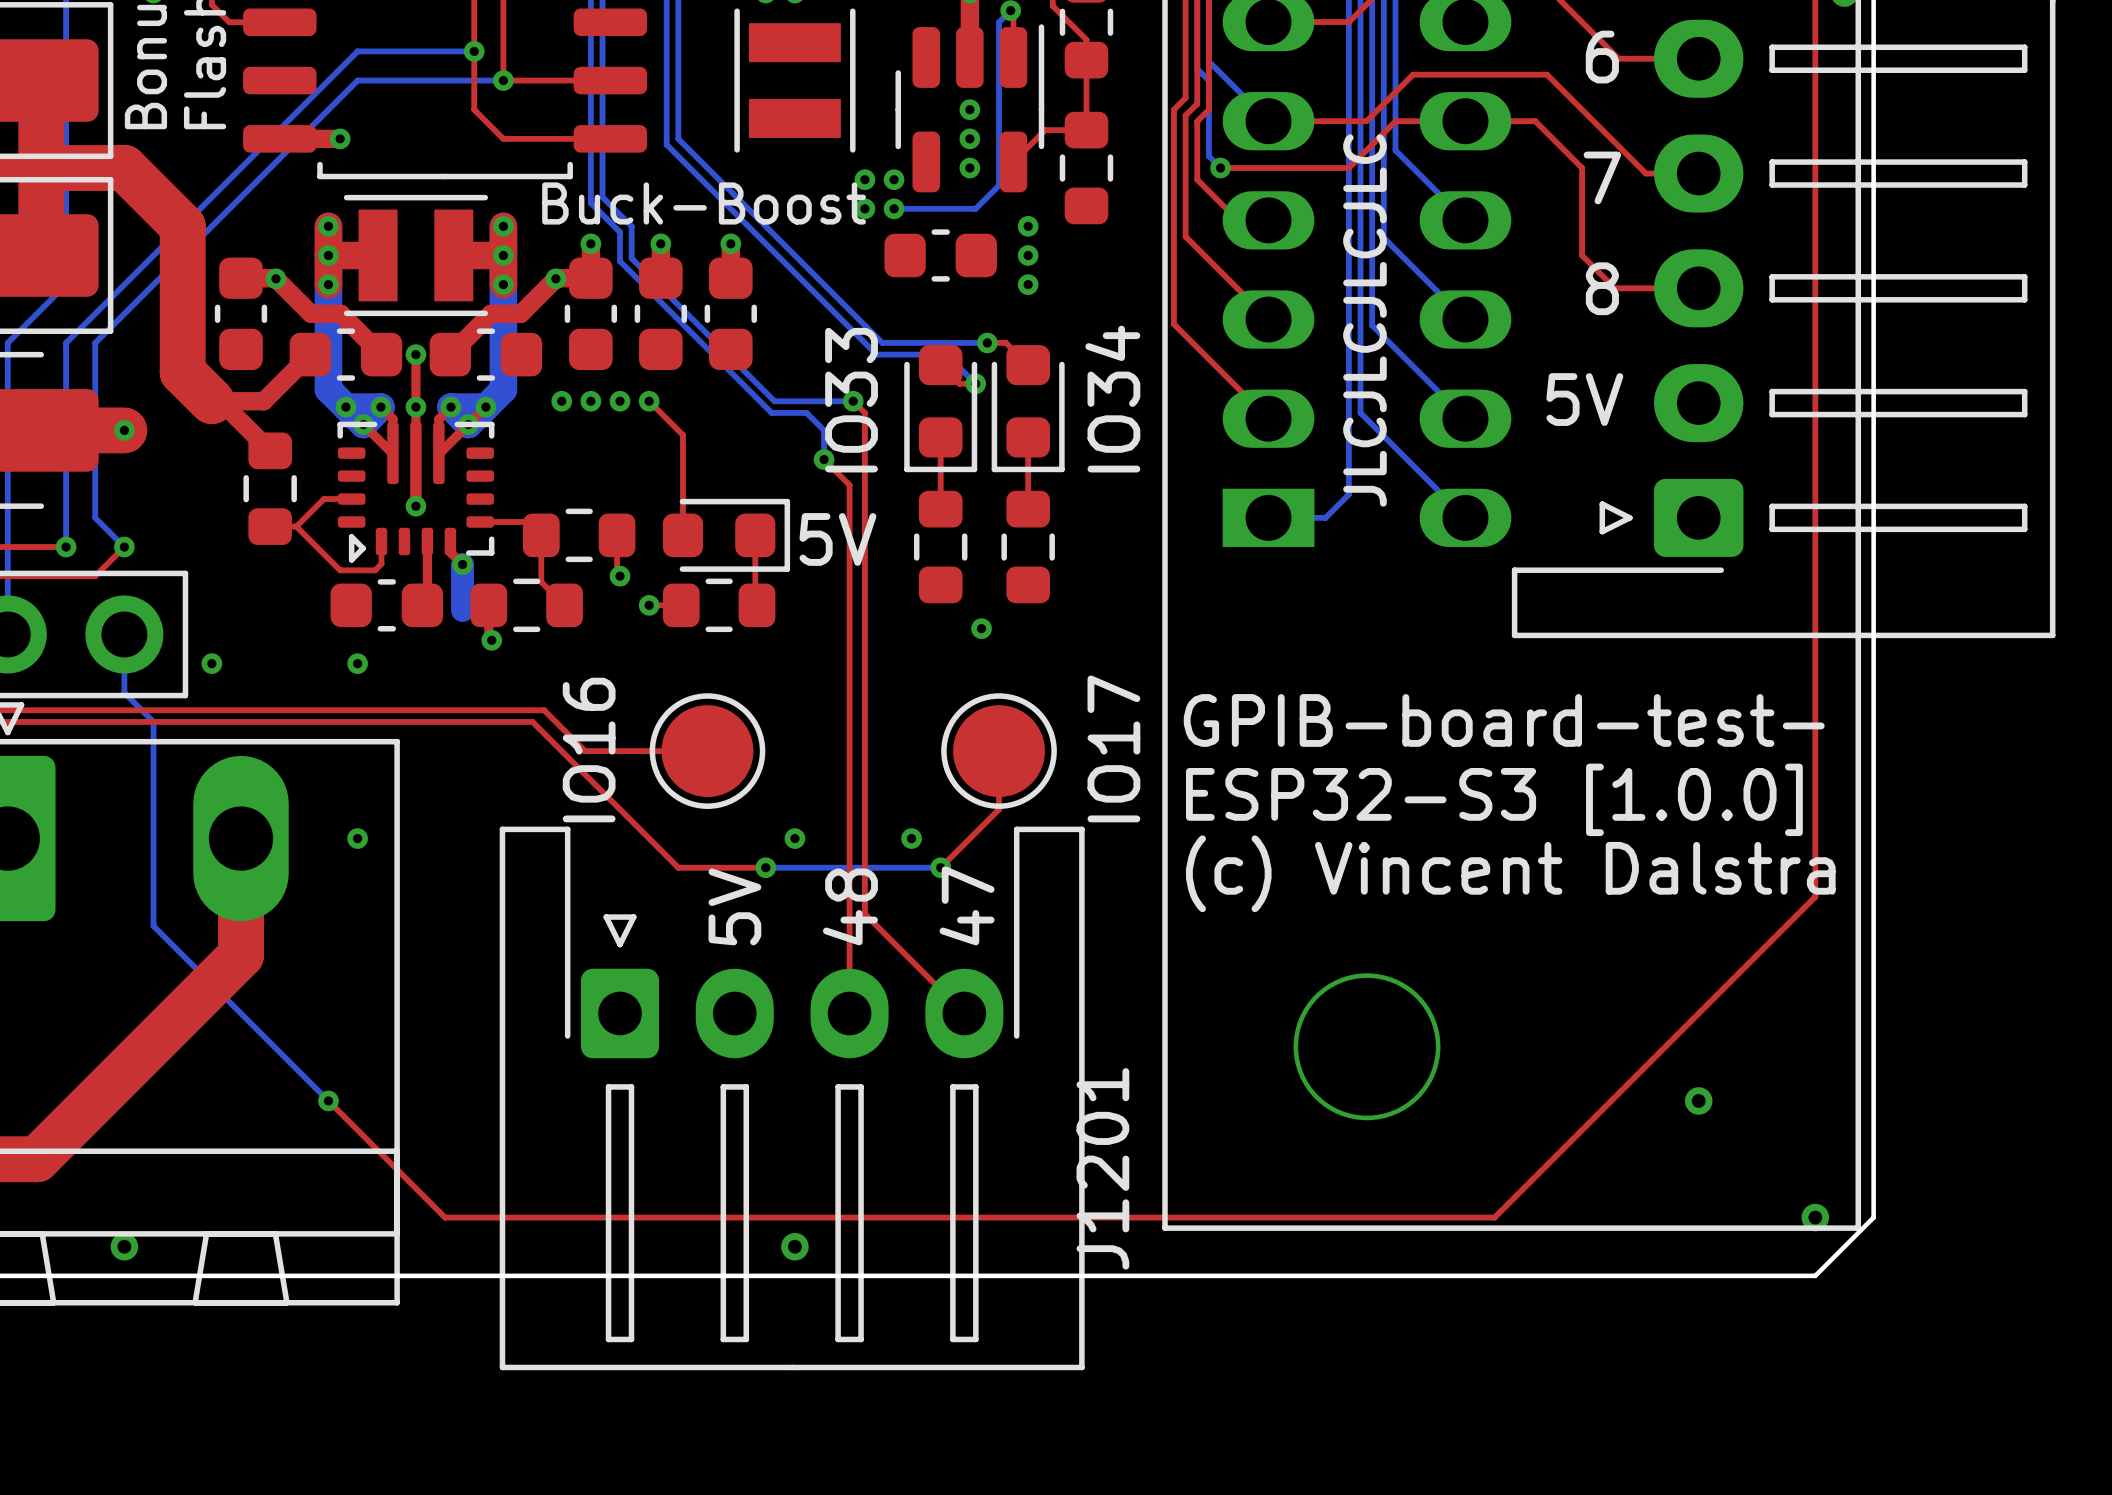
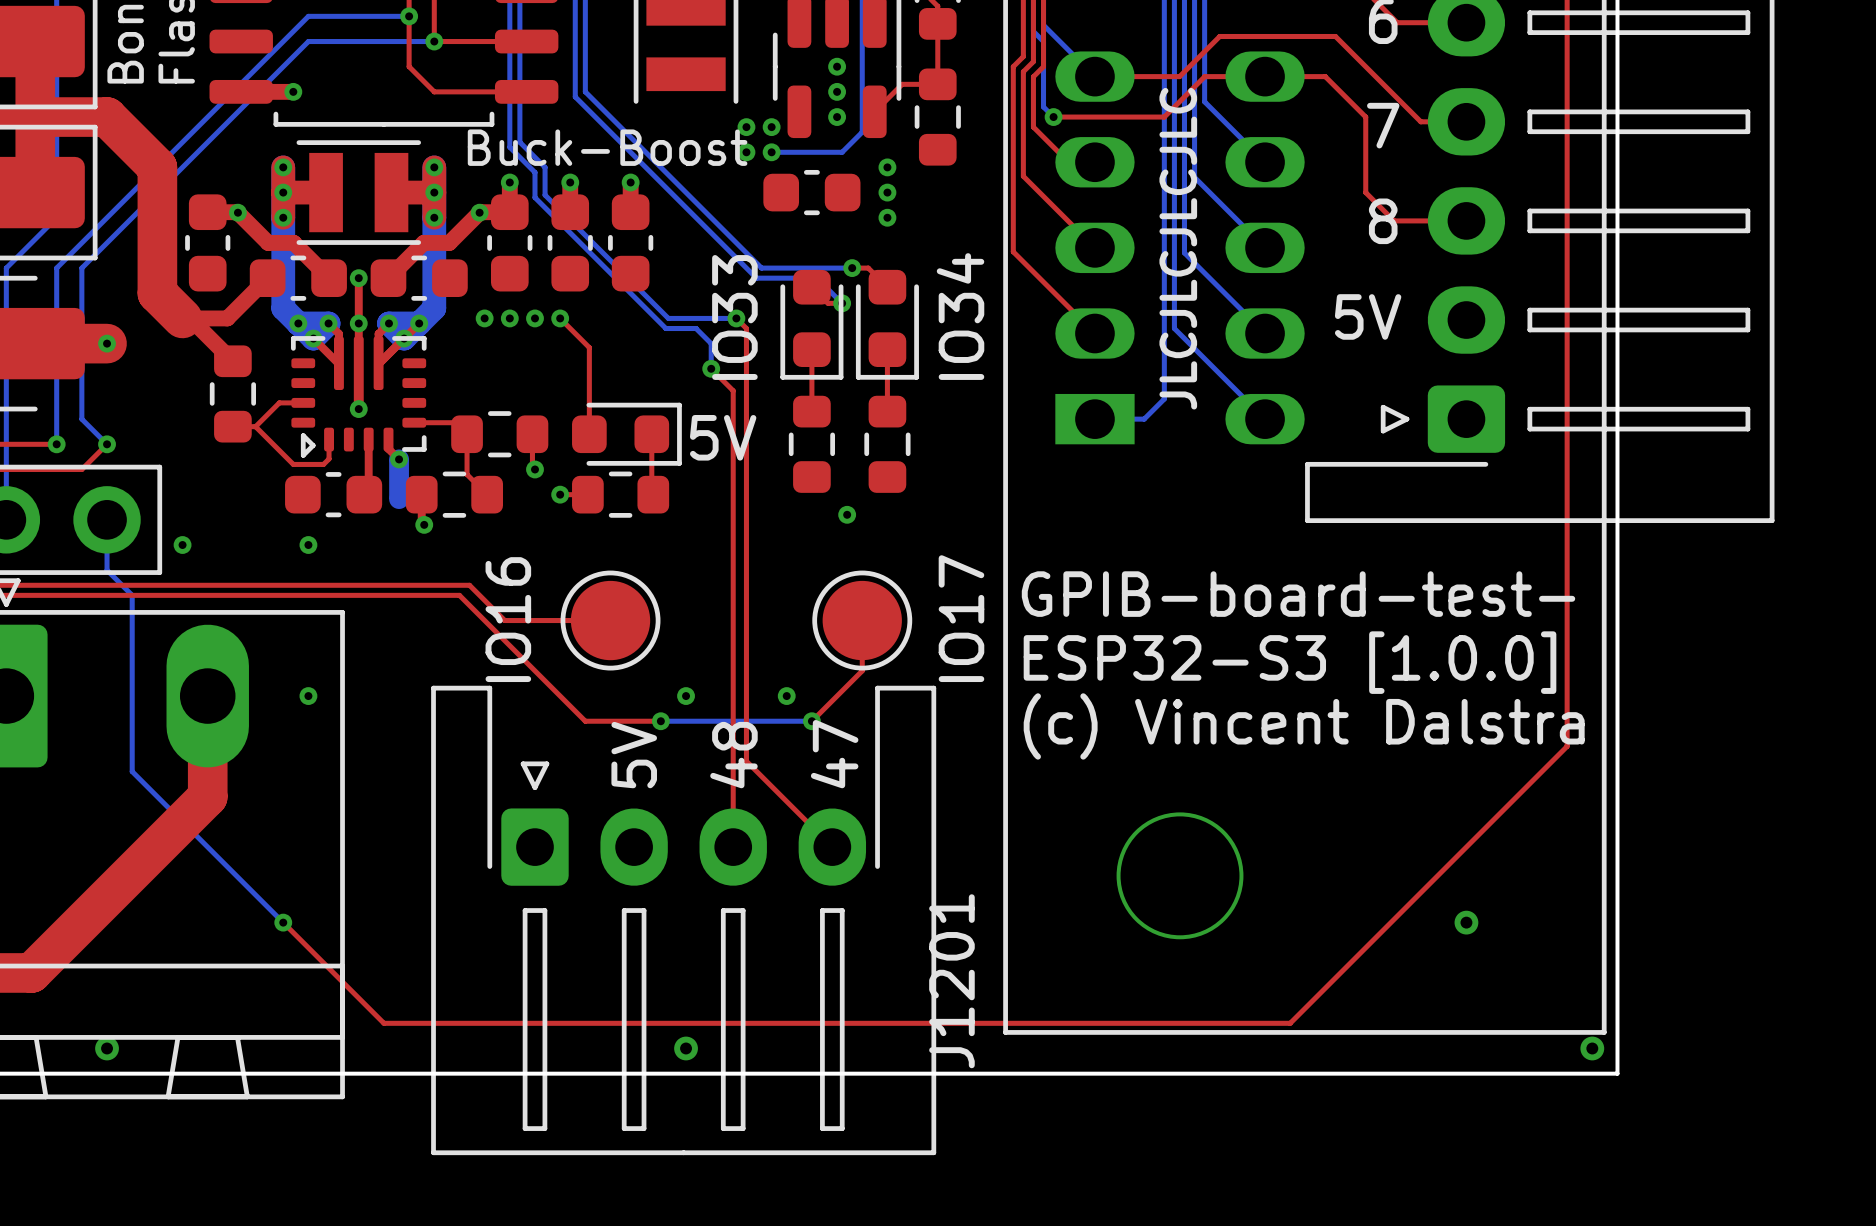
via position: (1815, 1217) -> (1592, 1048)
board edge: (1873, 1217) (1815, 1275) -> (1617, 1023) (1617, 1073) (1567, 1073)

